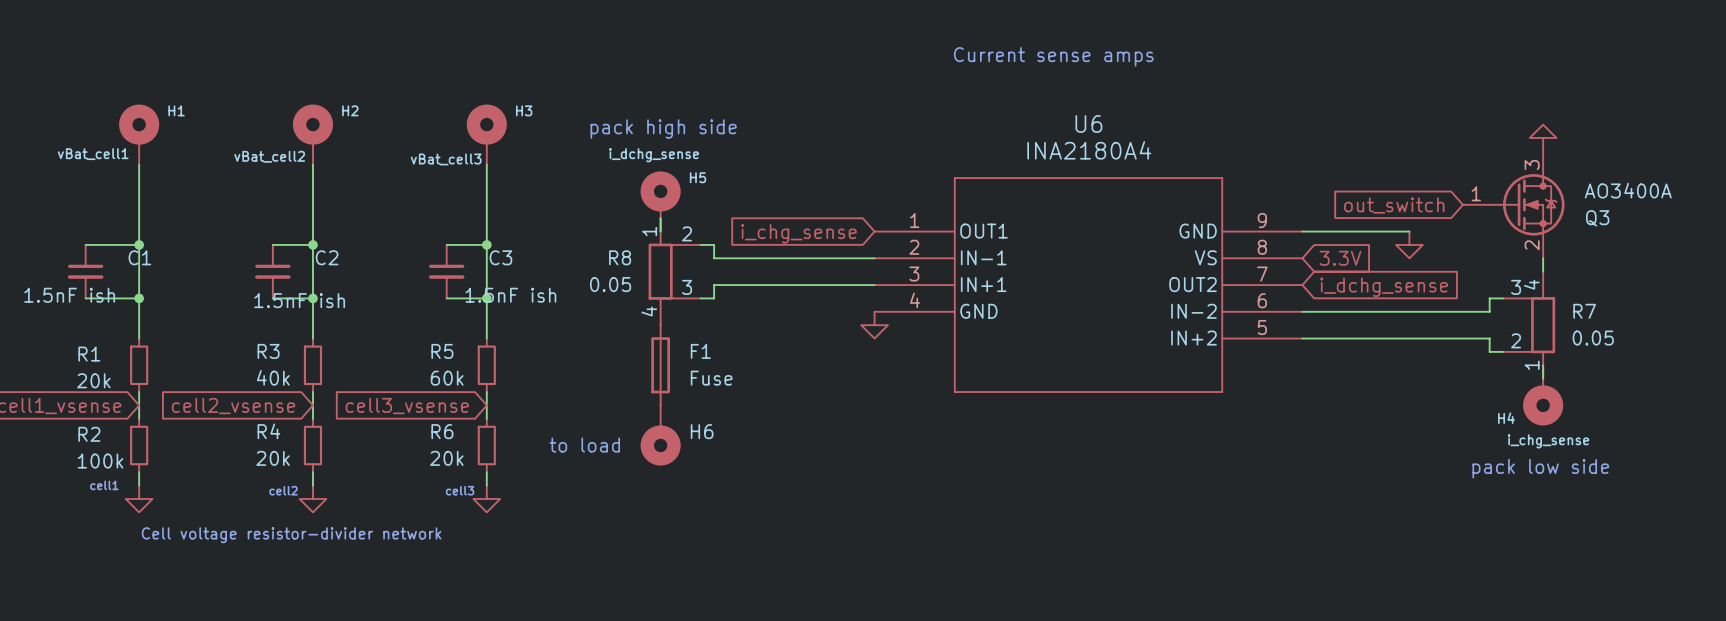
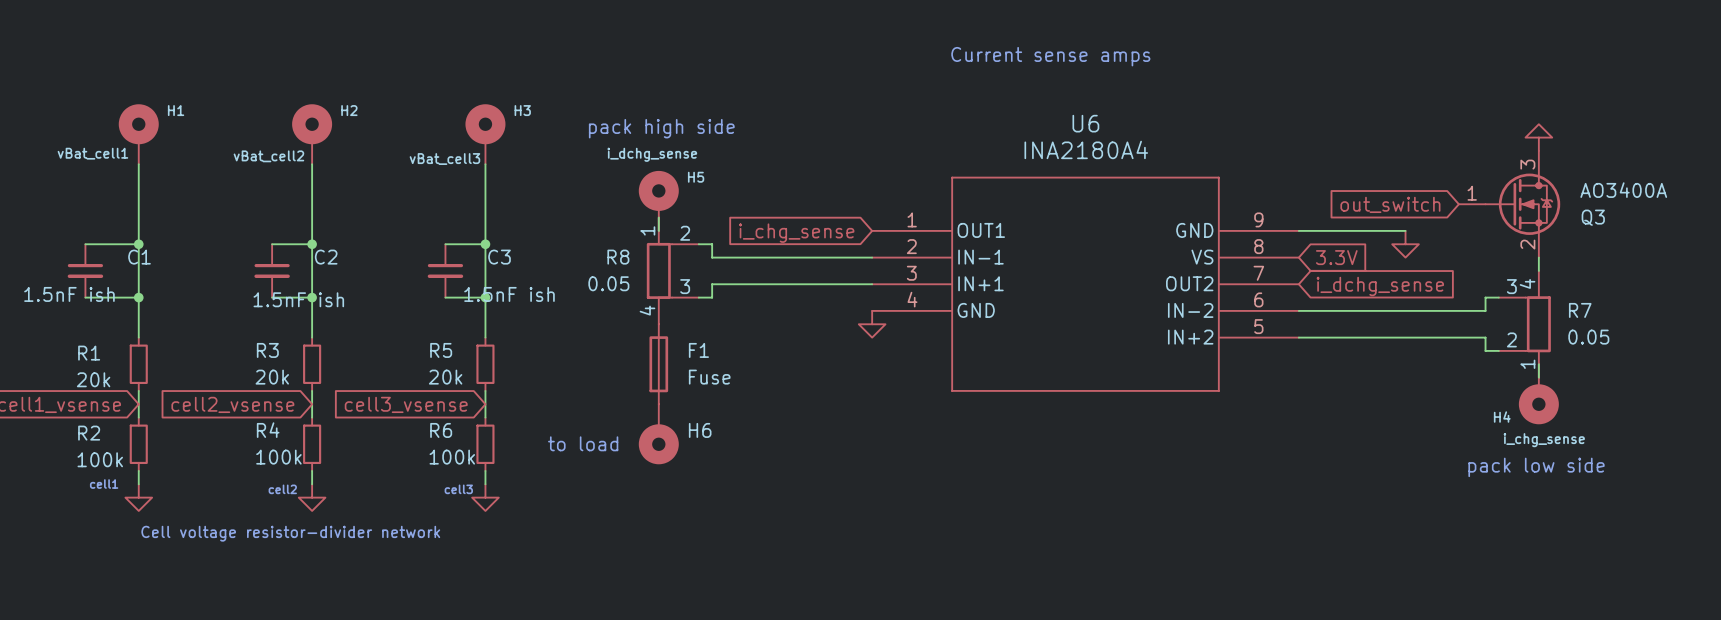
R3 value: 40k (273, 377) -> 20k (272, 377)
R5 value: 60k (447, 378) -> 20k (445, 377)
R4 value: 20k (273, 458) -> 100k (278, 457)
R6 value: 20k (446, 458) -> 100k (452, 457)

